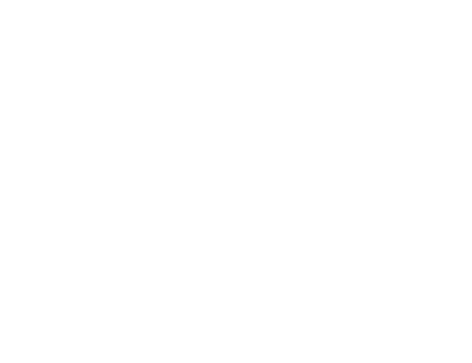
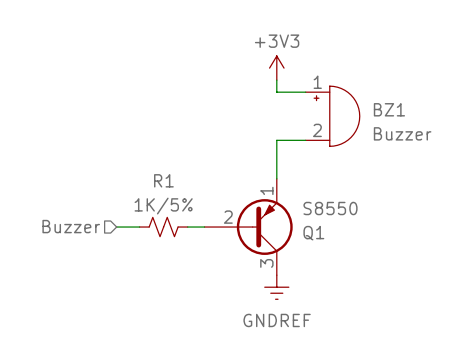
power symbol: none -> +3V3 (276, 68)
wire: none -> (276, 80) (276, 92) (305, 92)
BZ1: none -> Buzzer (332, 116)
wire: none -> (305, 140) (276, 140) (276, 178)
hierarchical label: none -> Buzzer (71, 226)
wire: none -> (116, 227) (139, 227)
R1: none -> 1K/5% (163, 227)
wire: none -> (187, 227) (204, 227)
Q1: none -> S8550 (248, 227)
power symbol: none -> GNDREF (276, 287)

